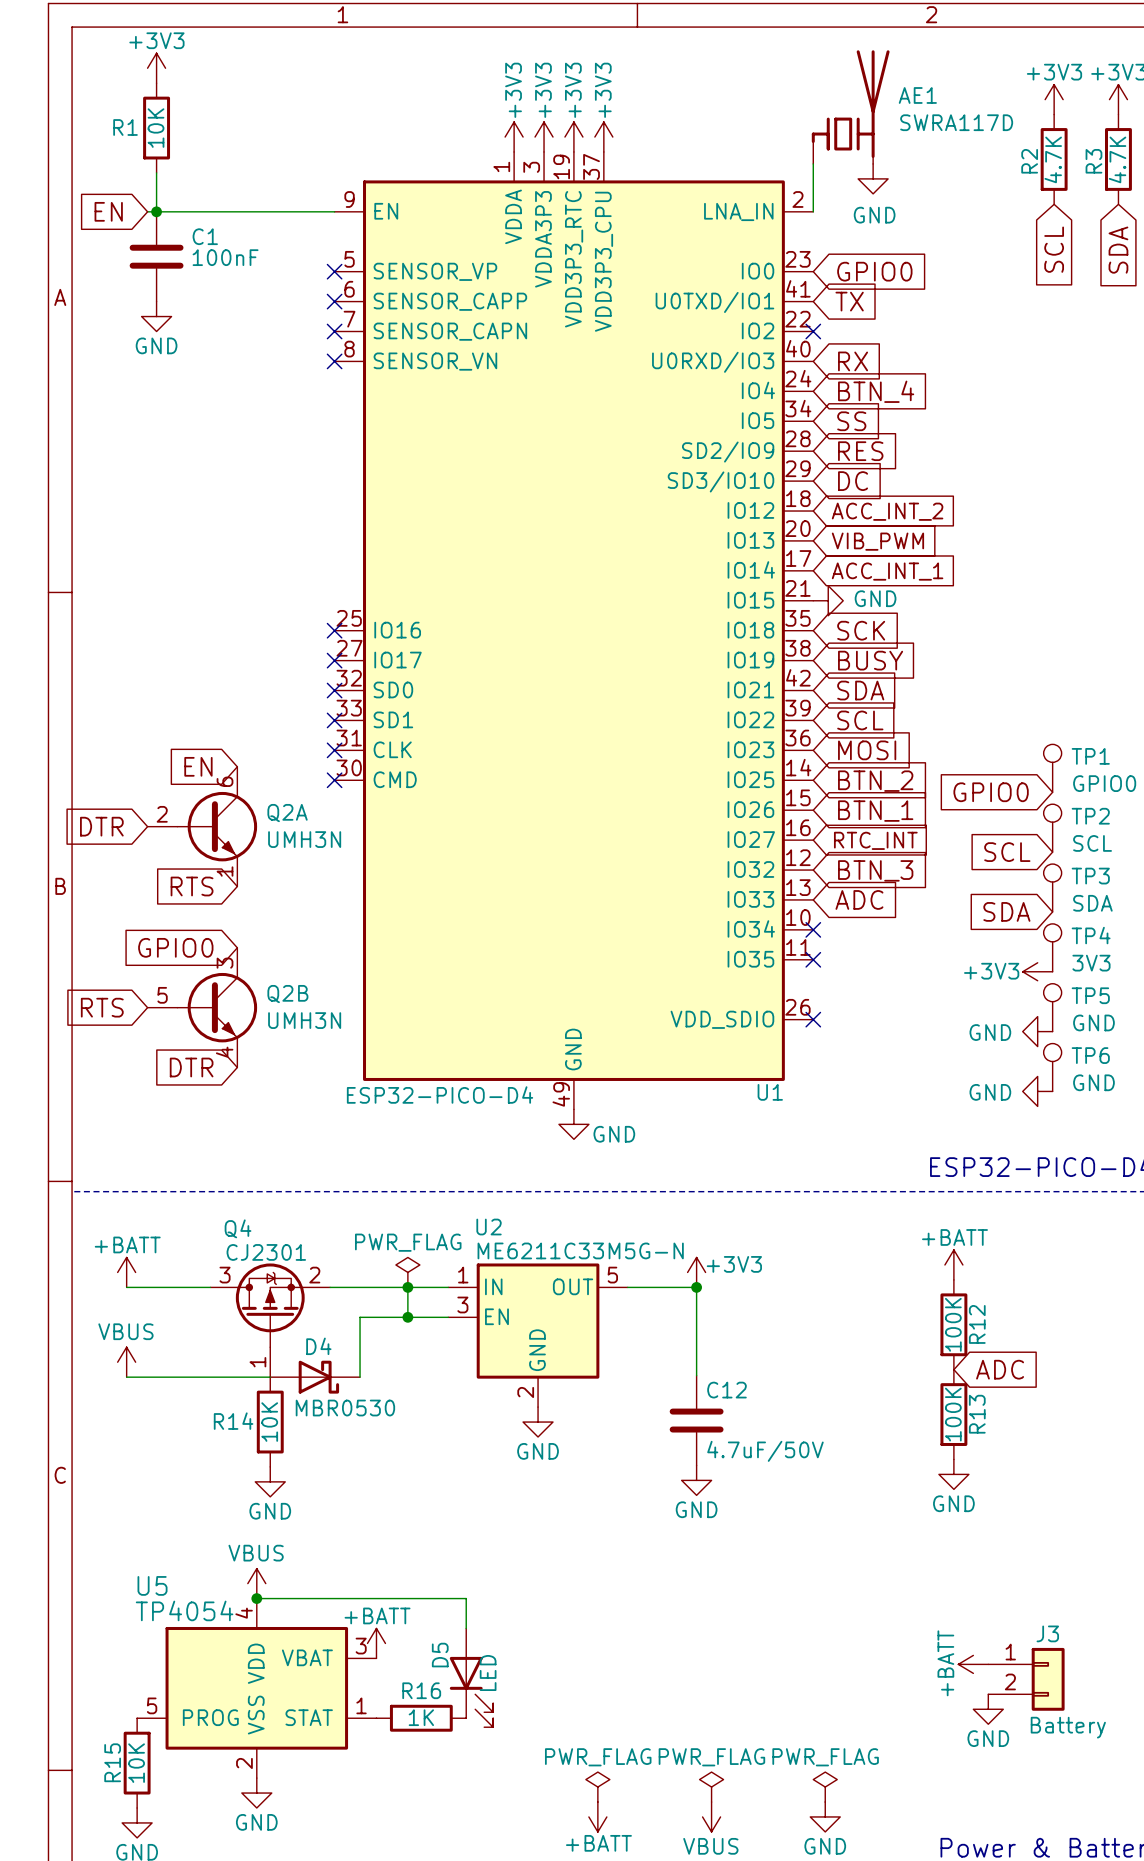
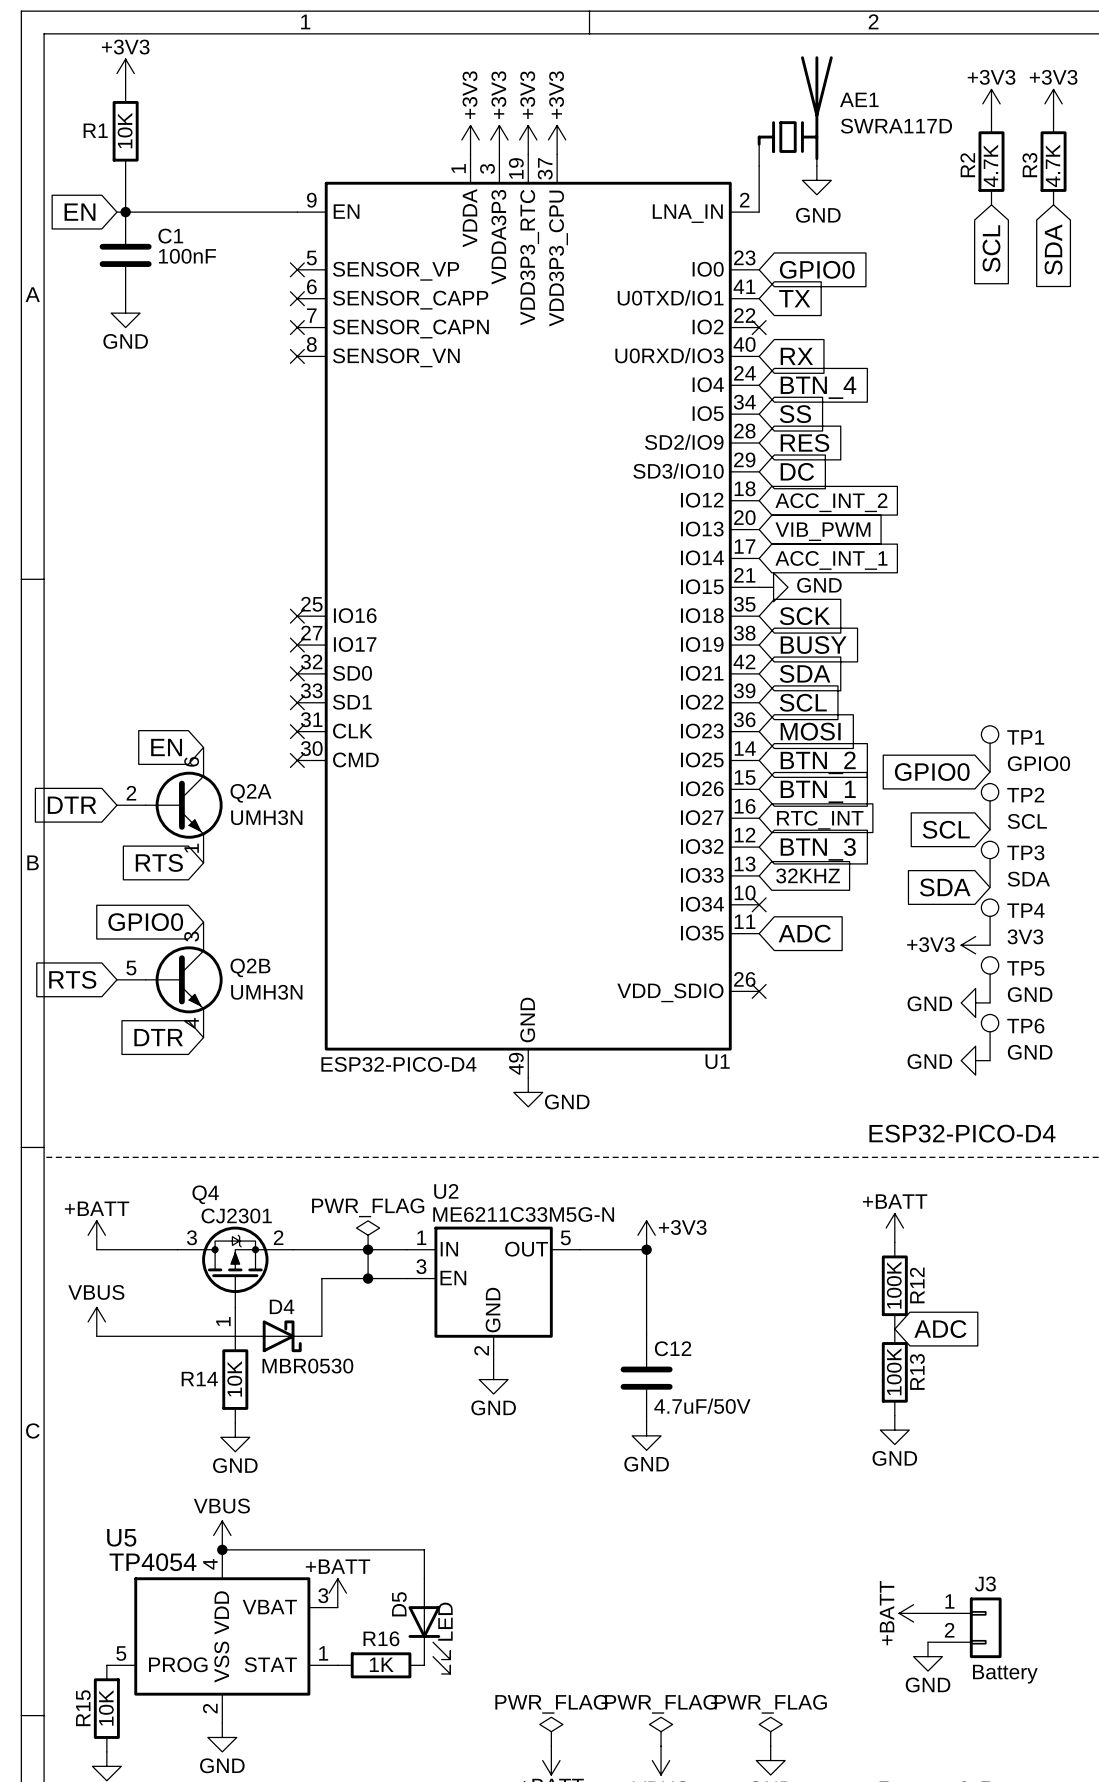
global label: ADC (859, 899) -> 32KHZ (808, 875)
no-connect mark: (813, 959) -> none
global label: none -> ADC (804, 933)

